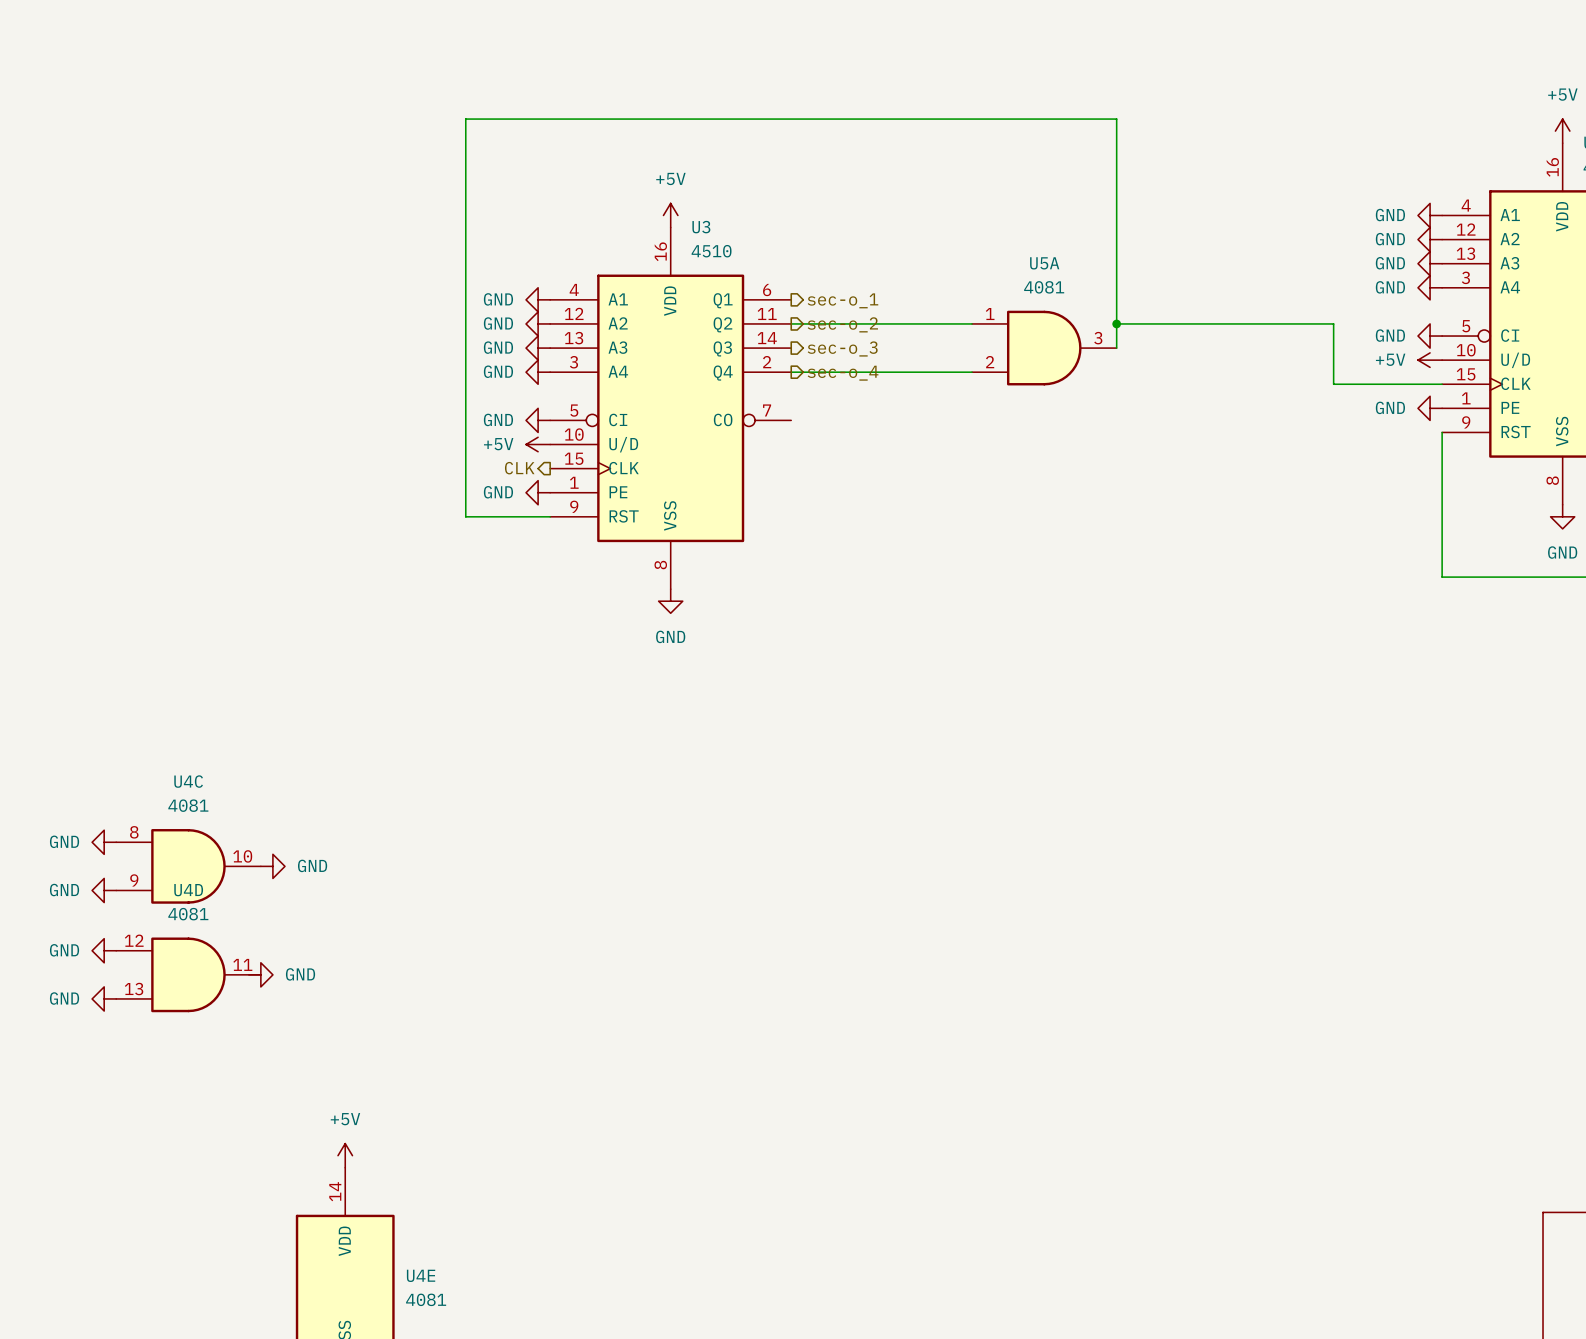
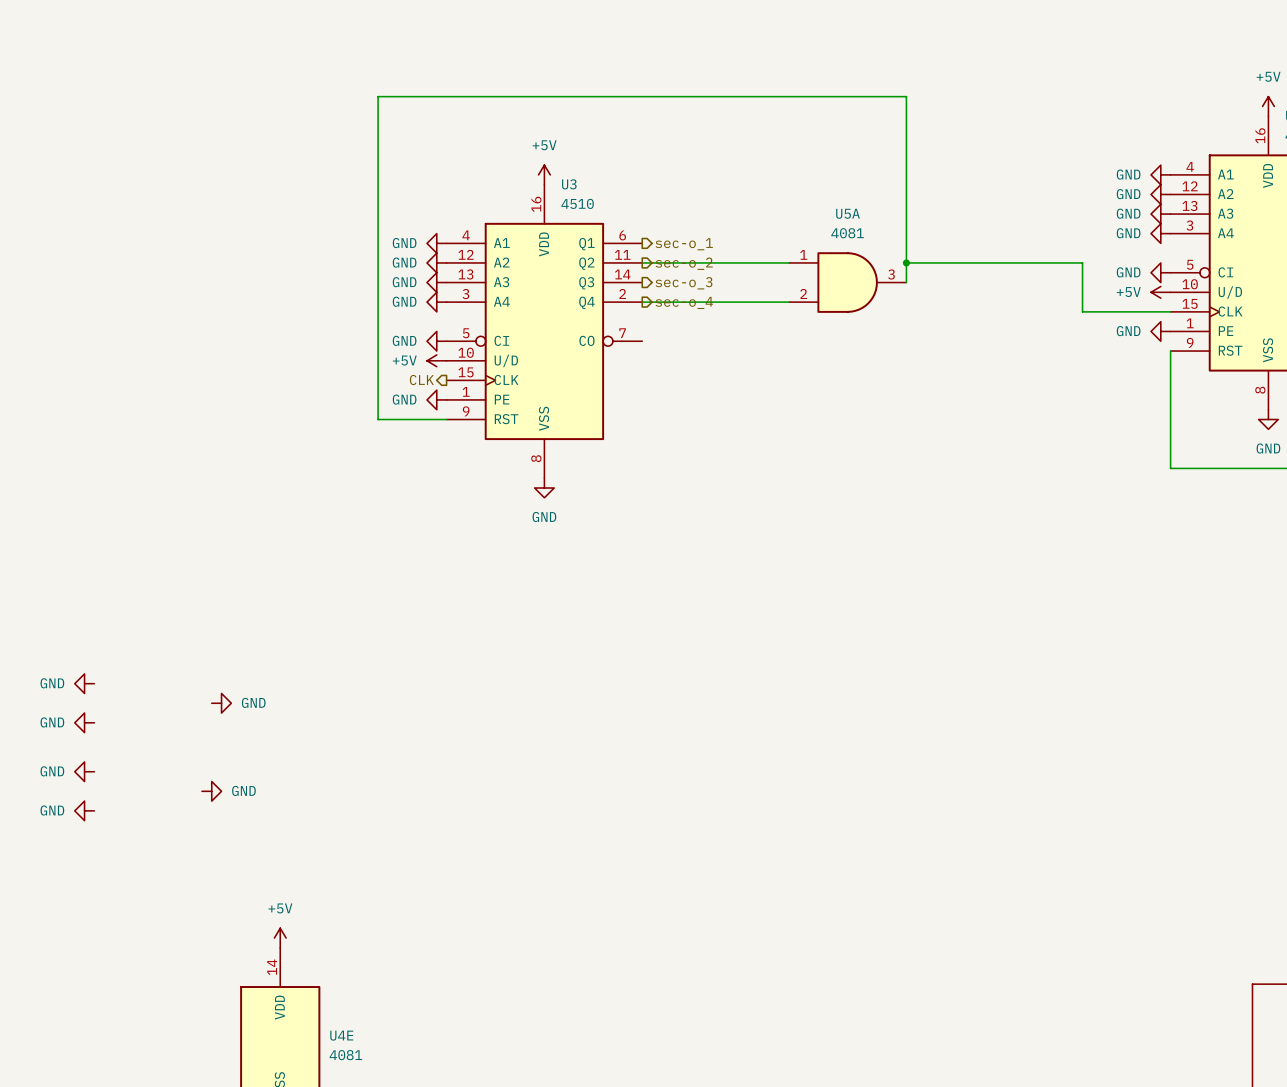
U4C: 4081 (188, 866) -> none
U4D: 4081 (188, 974) -> none

